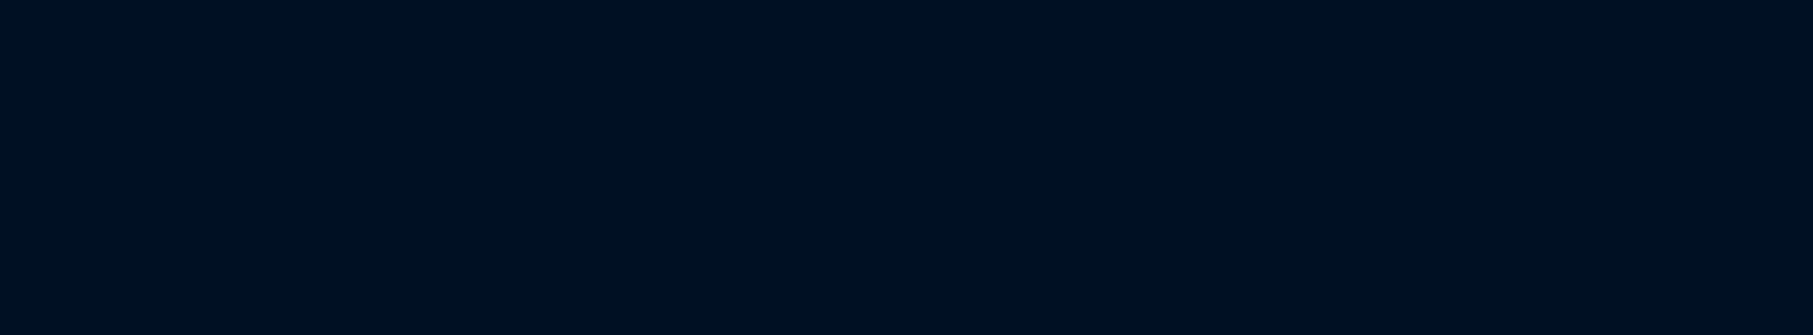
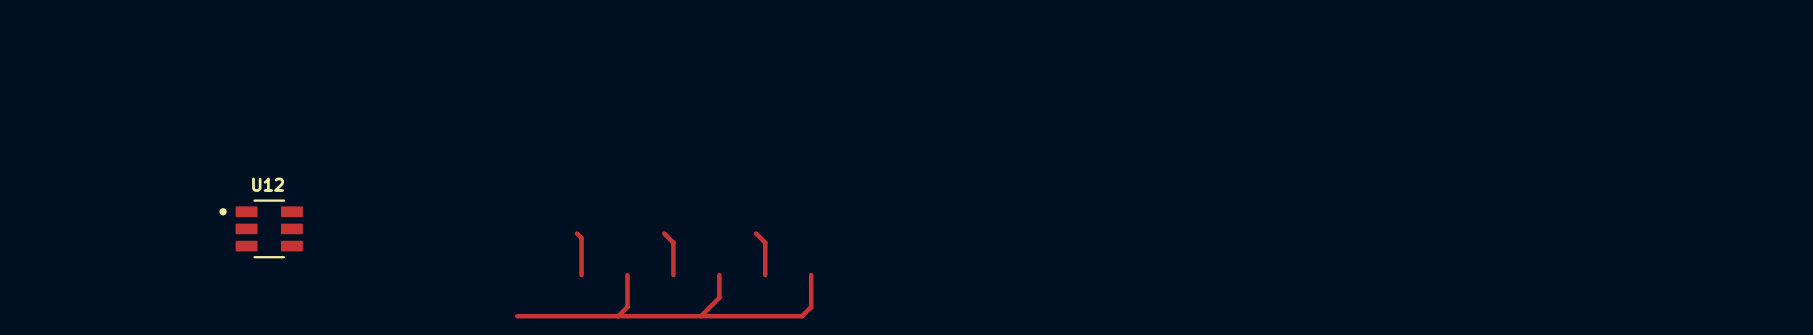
U12: none -> (261, 228)
top track: none -> (576, 233) (581, 238) (581, 275)
top track: none -> (664, 233) (673, 242) (673, 275)
top track: none -> (756, 233) (765, 242) (765, 275)
top track: none -> (627, 275) (627, 306) (618, 316)
top track: none -> (719, 275) (719, 297) (700, 316)
top track: none -> (811, 275) (811, 306) (802, 316) (517, 316)

